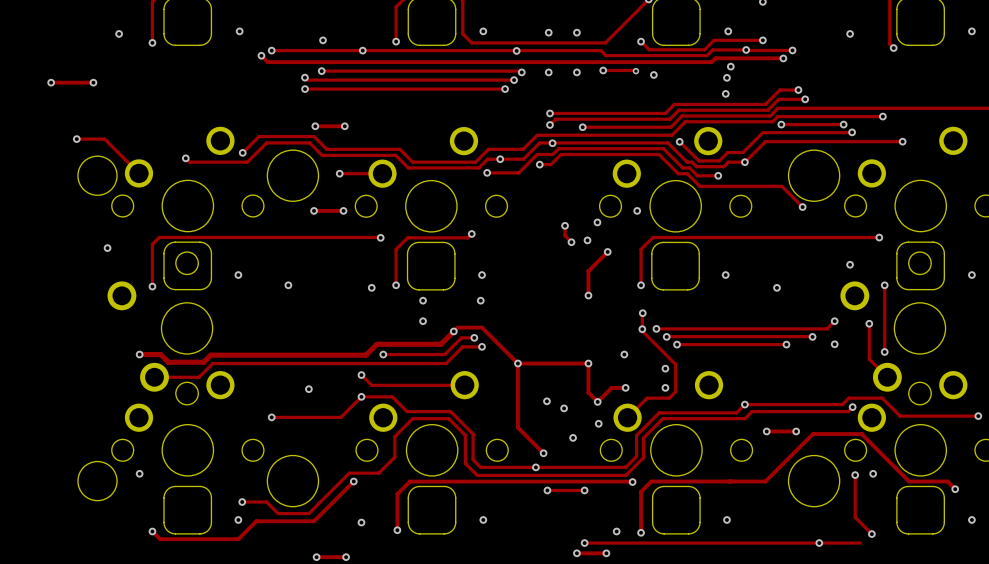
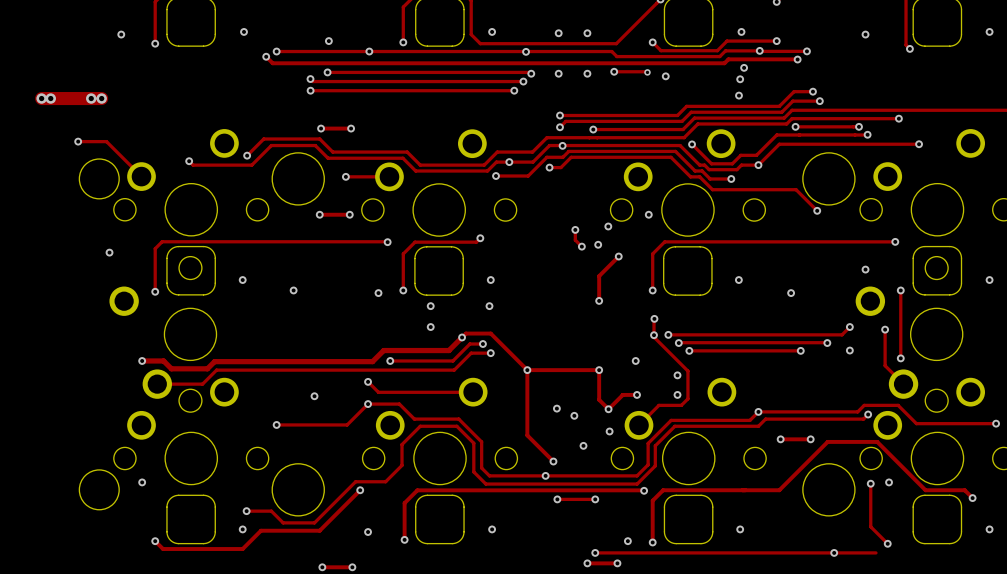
track: (51, 82) (93, 82) -> none
via: (51, 82) -> none
via: (93, 82) -> none
track: none -> (41, 98) (101, 98)
via: none -> (41, 98)
via: none -> (50, 98)
via: none -> (91, 98)
via: none -> (101, 98)

